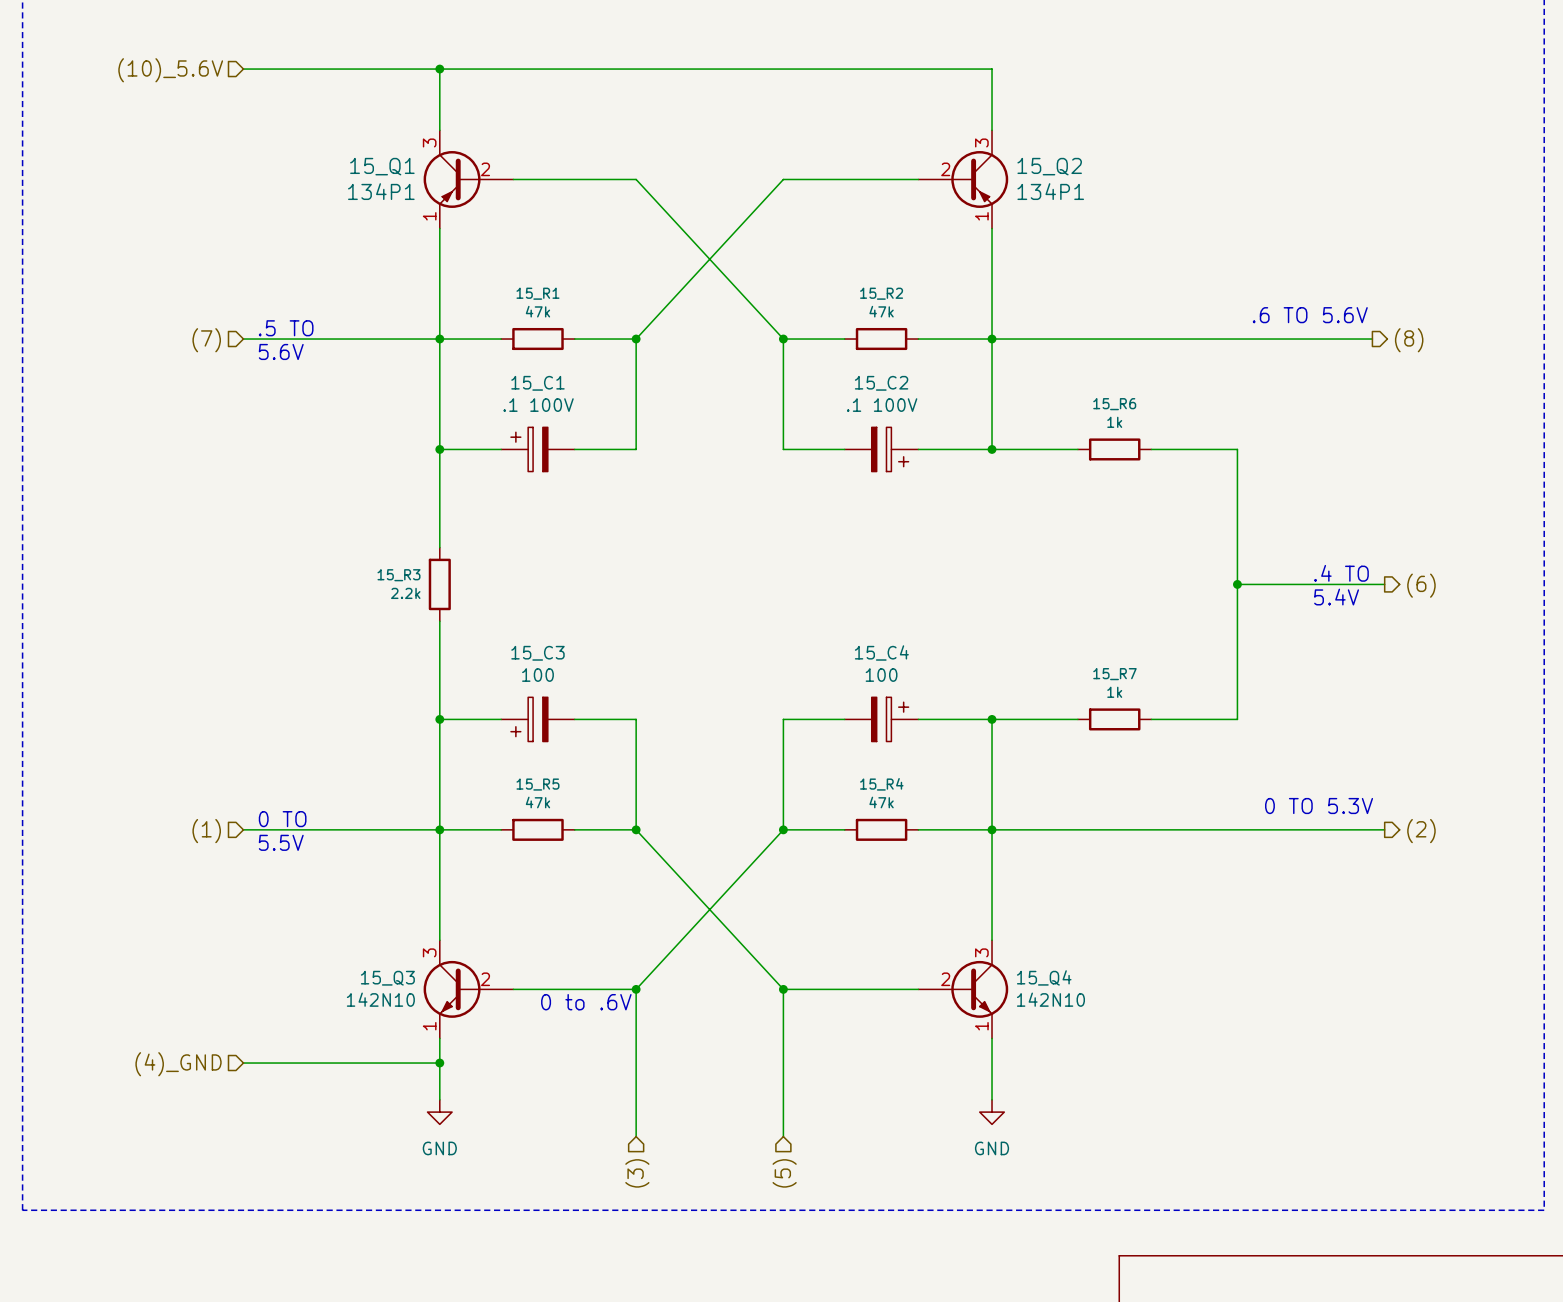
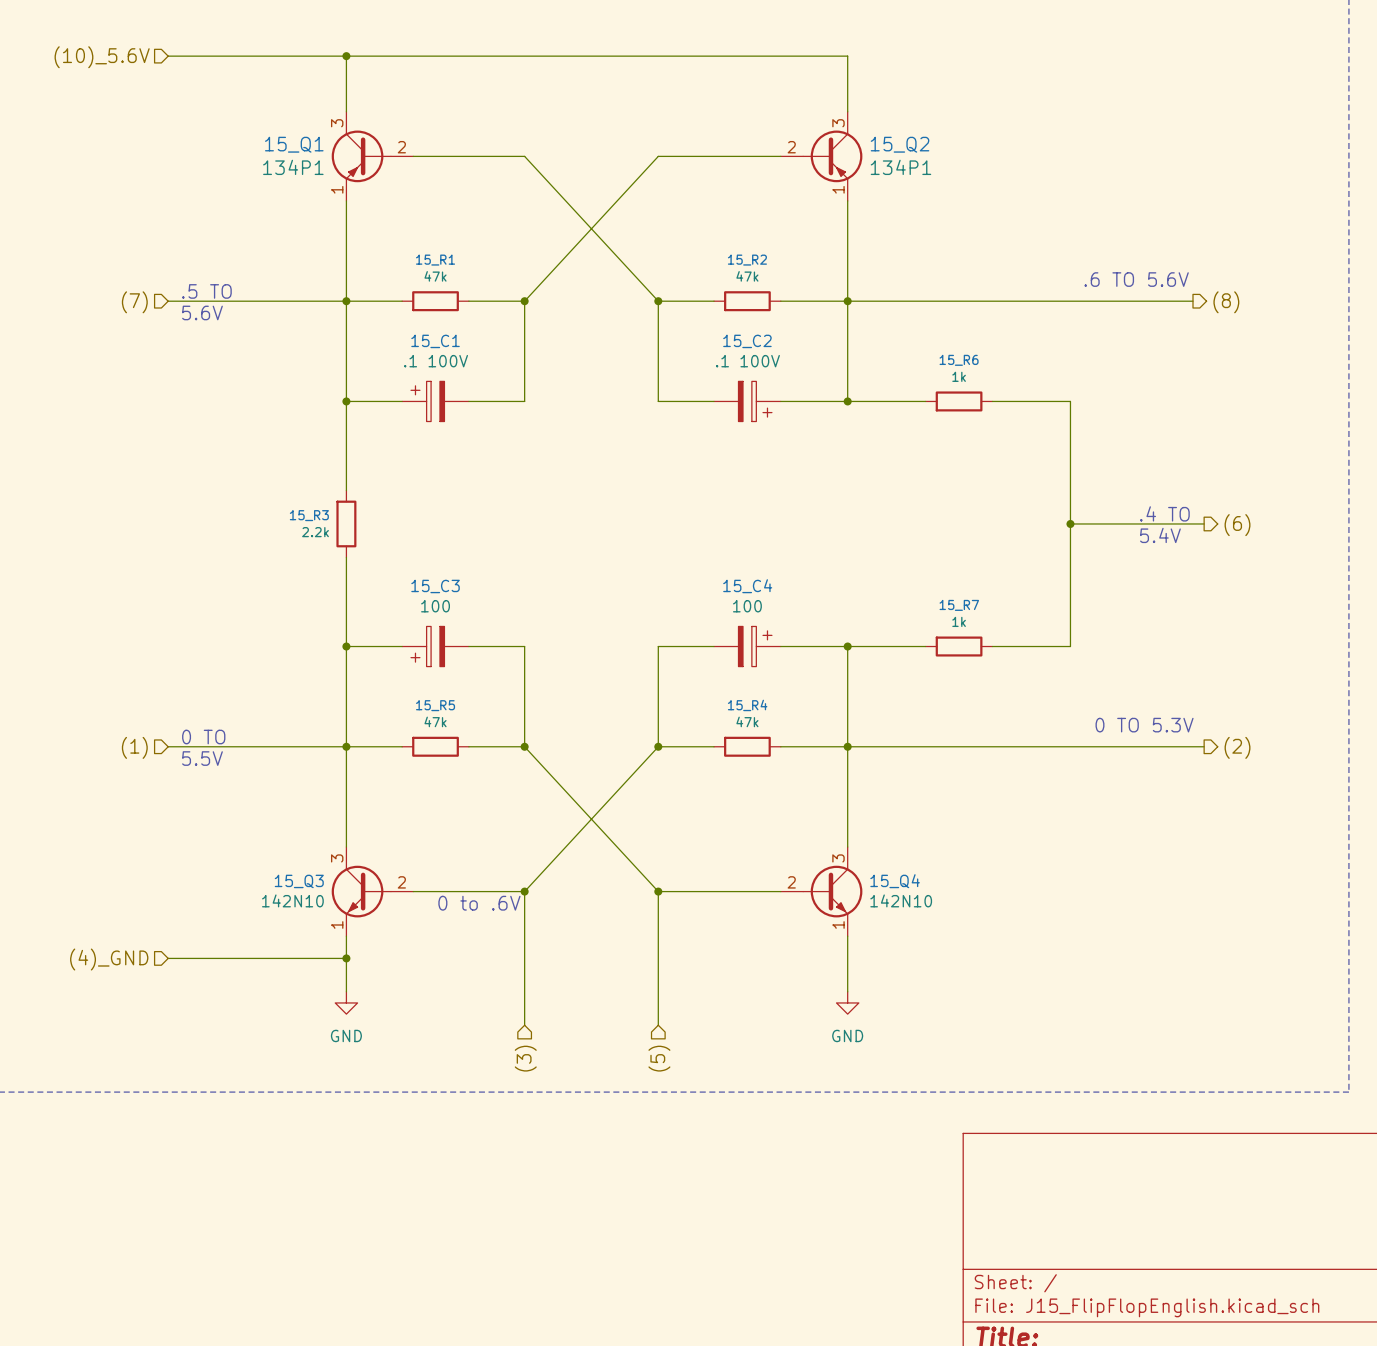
15_Q1 symbol: [423, 130, 514, 229] -> [331, 111, 414, 201]
15_Q2 symbol: [918, 130, 1009, 229] -> [780, 111, 863, 201]
15_Q3 symbol: [423, 940, 514, 1039] -> [331, 847, 414, 937]
15_Q4 symbol: [918, 940, 1009, 1039] -> [780, 847, 863, 937]

